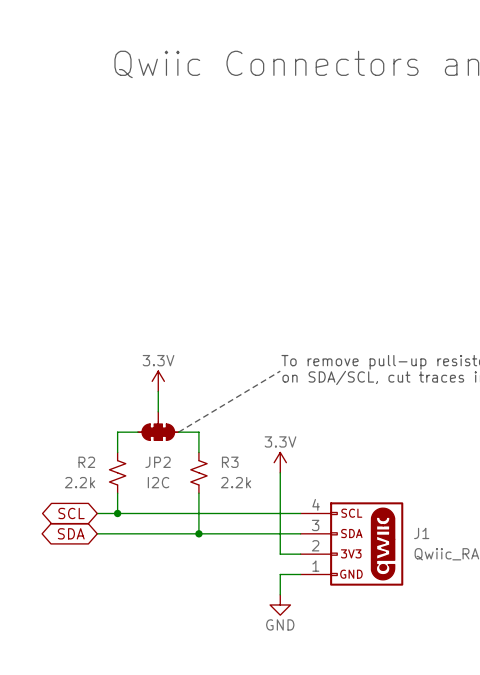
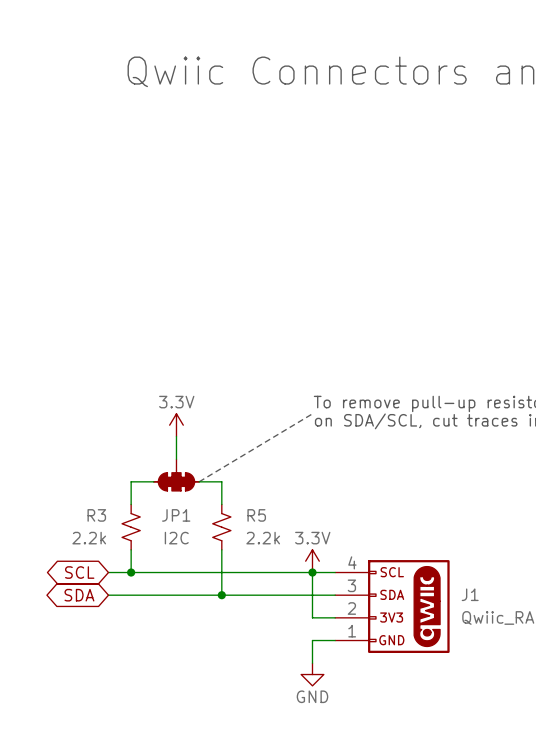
R2 name: R2 (86, 462) -> R3 (96, 515)
JP2 name: JP2 (158, 462) -> JP1 (176, 515)
R3 name: R3 (230, 462) -> R5 (256, 515)
power symbol position: 3.3V (280, 462) -> 3.3V (312, 561)
junction: none -> (312, 572)

